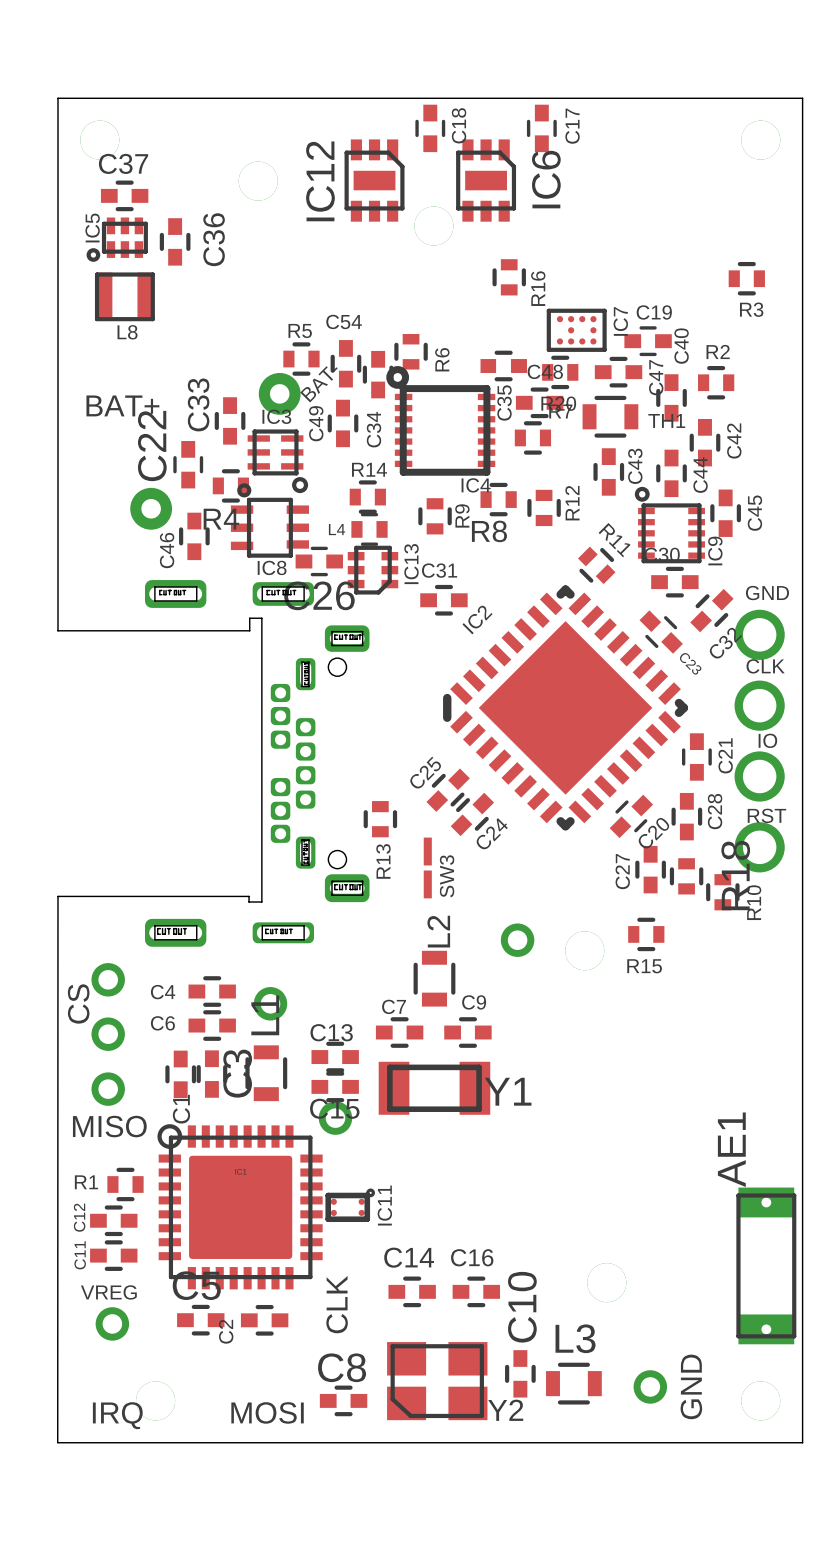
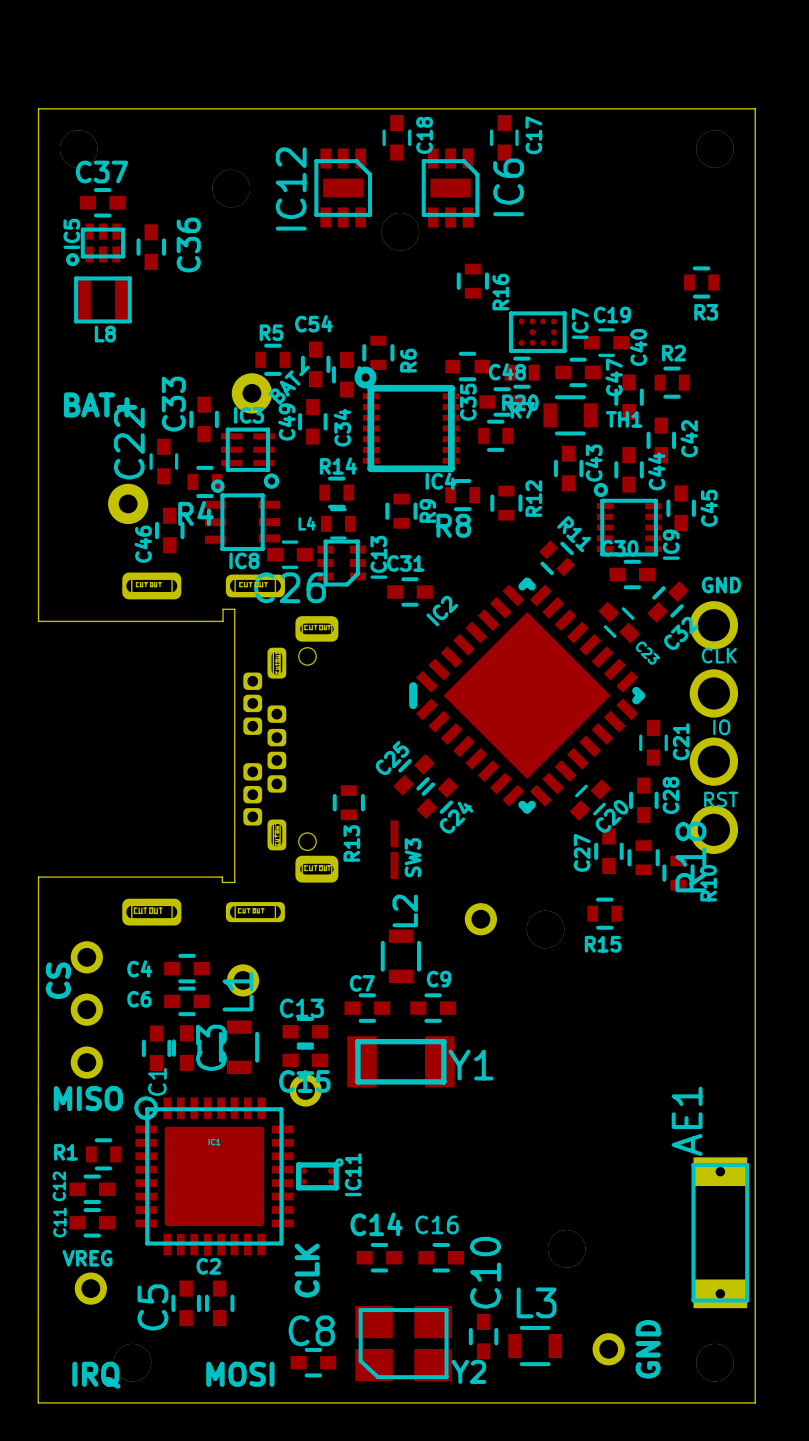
C5 rotation: 0° (200, 1320) -> 90° clockwise (186, 1303)
C2 rotation: 0° (264, 1320) -> 90° clockwise (219, 1303)

